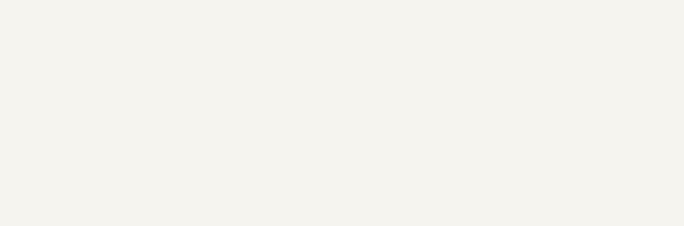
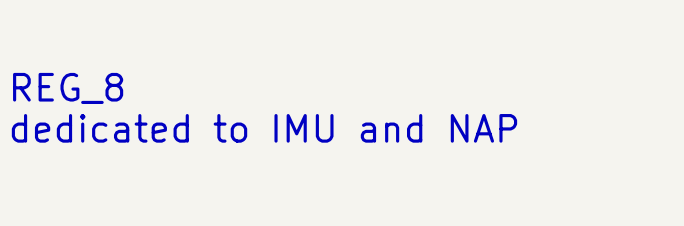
text: none -> REG_8 (68, 88)
text: none -> dedicated to IMU and NAP (264, 128)

